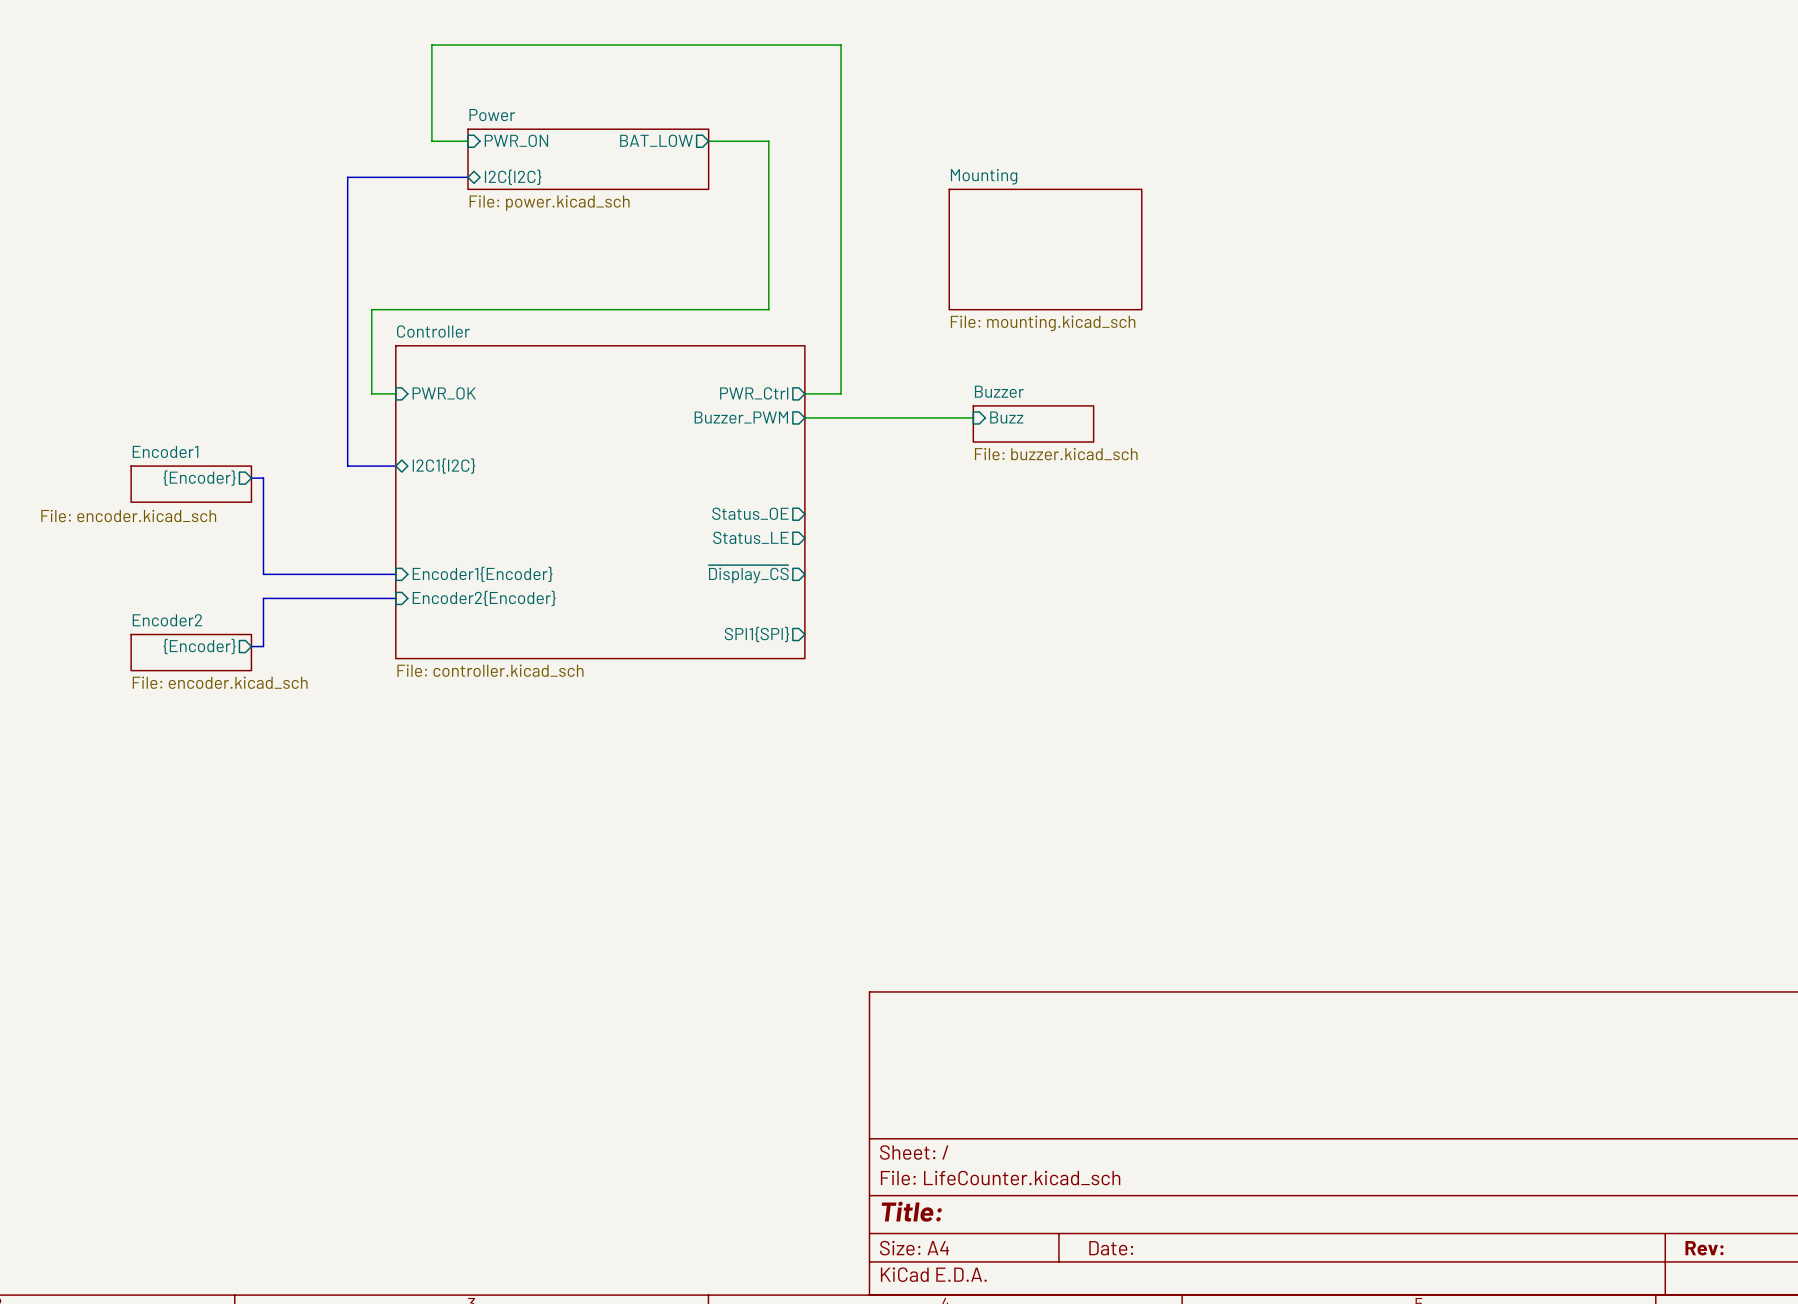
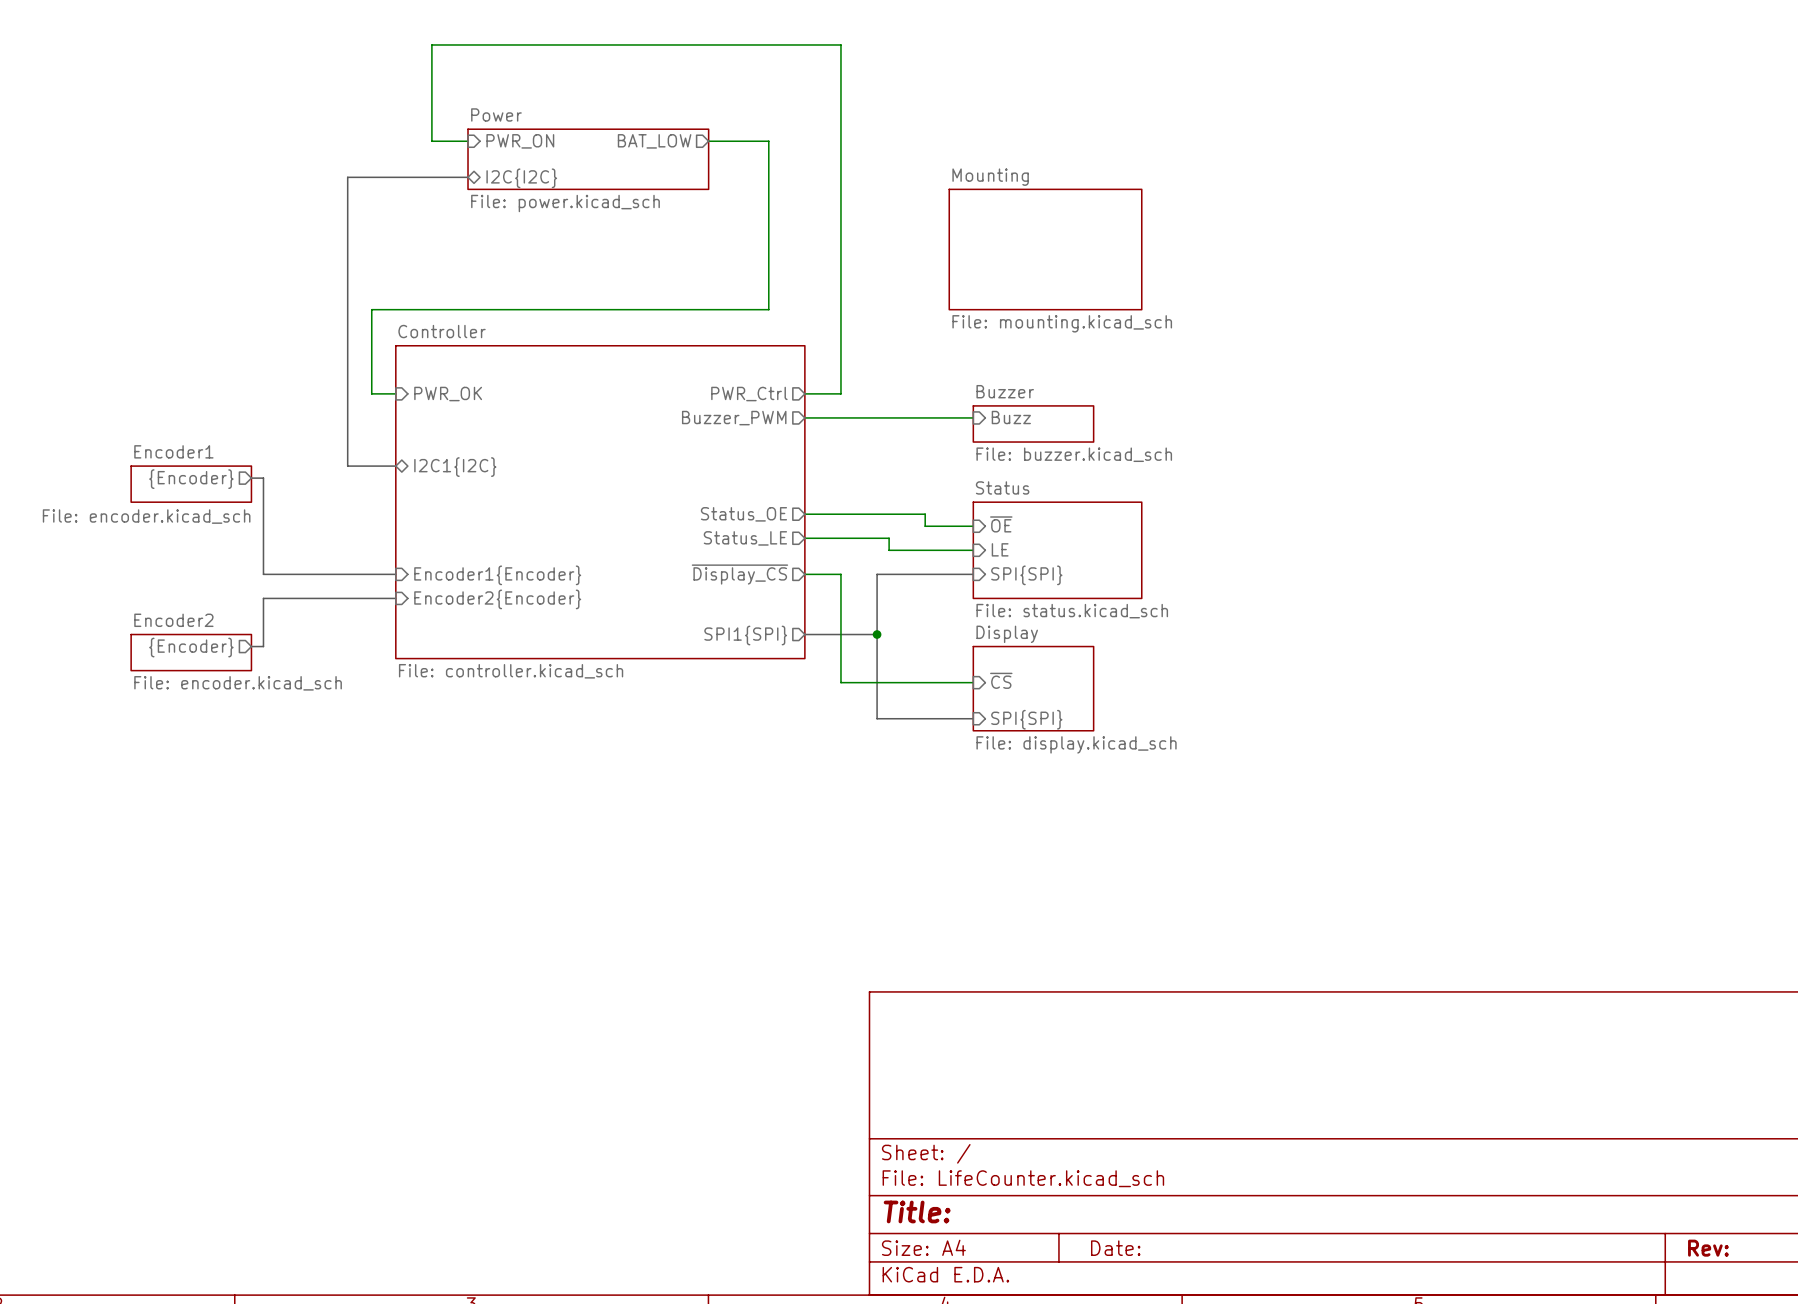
wire: none -> (804, 514) (925, 514) (925, 526) (973, 526)
sheet pin: none -> ~{OE} (1001, 524)
wire: none -> (804, 538) (889, 538) (889, 550) (973, 550)
sheet pin: none -> LE (1000, 549)
sheet Status: none -> File: status.kicad_sch (1057, 550)
wire: none -> (804, 574) (840, 574) (840, 682) (973, 682)
bus: none -> (973, 574) (877, 574) (877, 718) (973, 718)
sheet pin: none -> SPI{SPI} (1026, 575)
bus: none -> (804, 634) (877, 634)
junction: none -> (877, 634)
sheet pin: none -> ~{CS} (1001, 680)
sheet Display: none -> File: display.kicad_sch (1033, 688)
sheet pin: none -> SPI{SPI} (1026, 719)

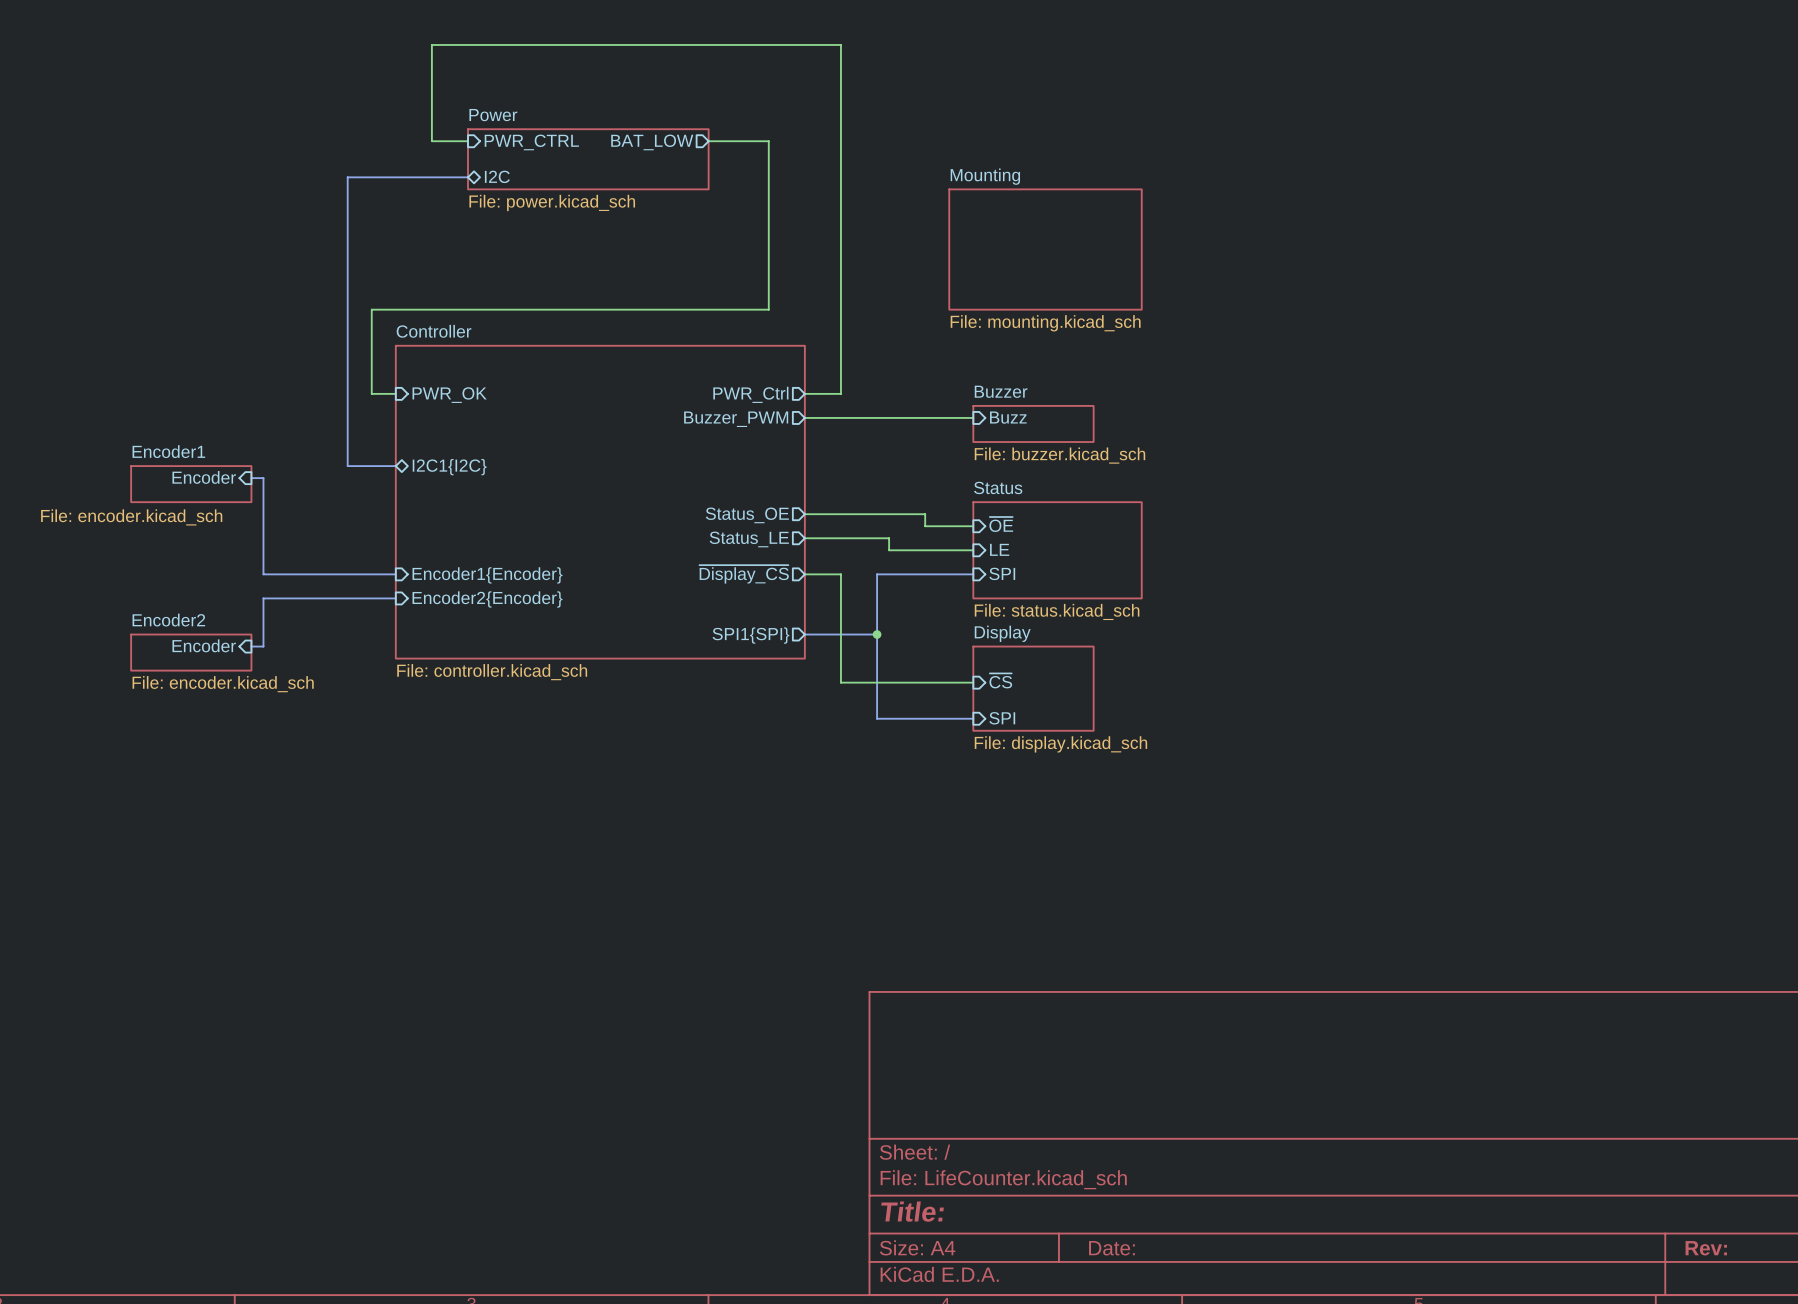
sheet pin: PWR_ON (520, 141) -> PWR_CTRL (531, 142)
sheet pin: I2C{I2C} (521, 178) -> I2C (497, 176)
sheet pin shape: output (191, 479) -> input (204, 477)
sheet pin: {Encoder} (191, 479) -> Encoder (204, 477)
sheet pin: SPI{SPI} (1026, 575) -> SPI (1002, 573)
sheet pin shape: output (191, 647) -> input (204, 645)
sheet pin: {Encoder} (191, 647) -> Encoder (204, 645)
sheet pin: SPI{SPI} (1026, 719) -> SPI (1002, 718)

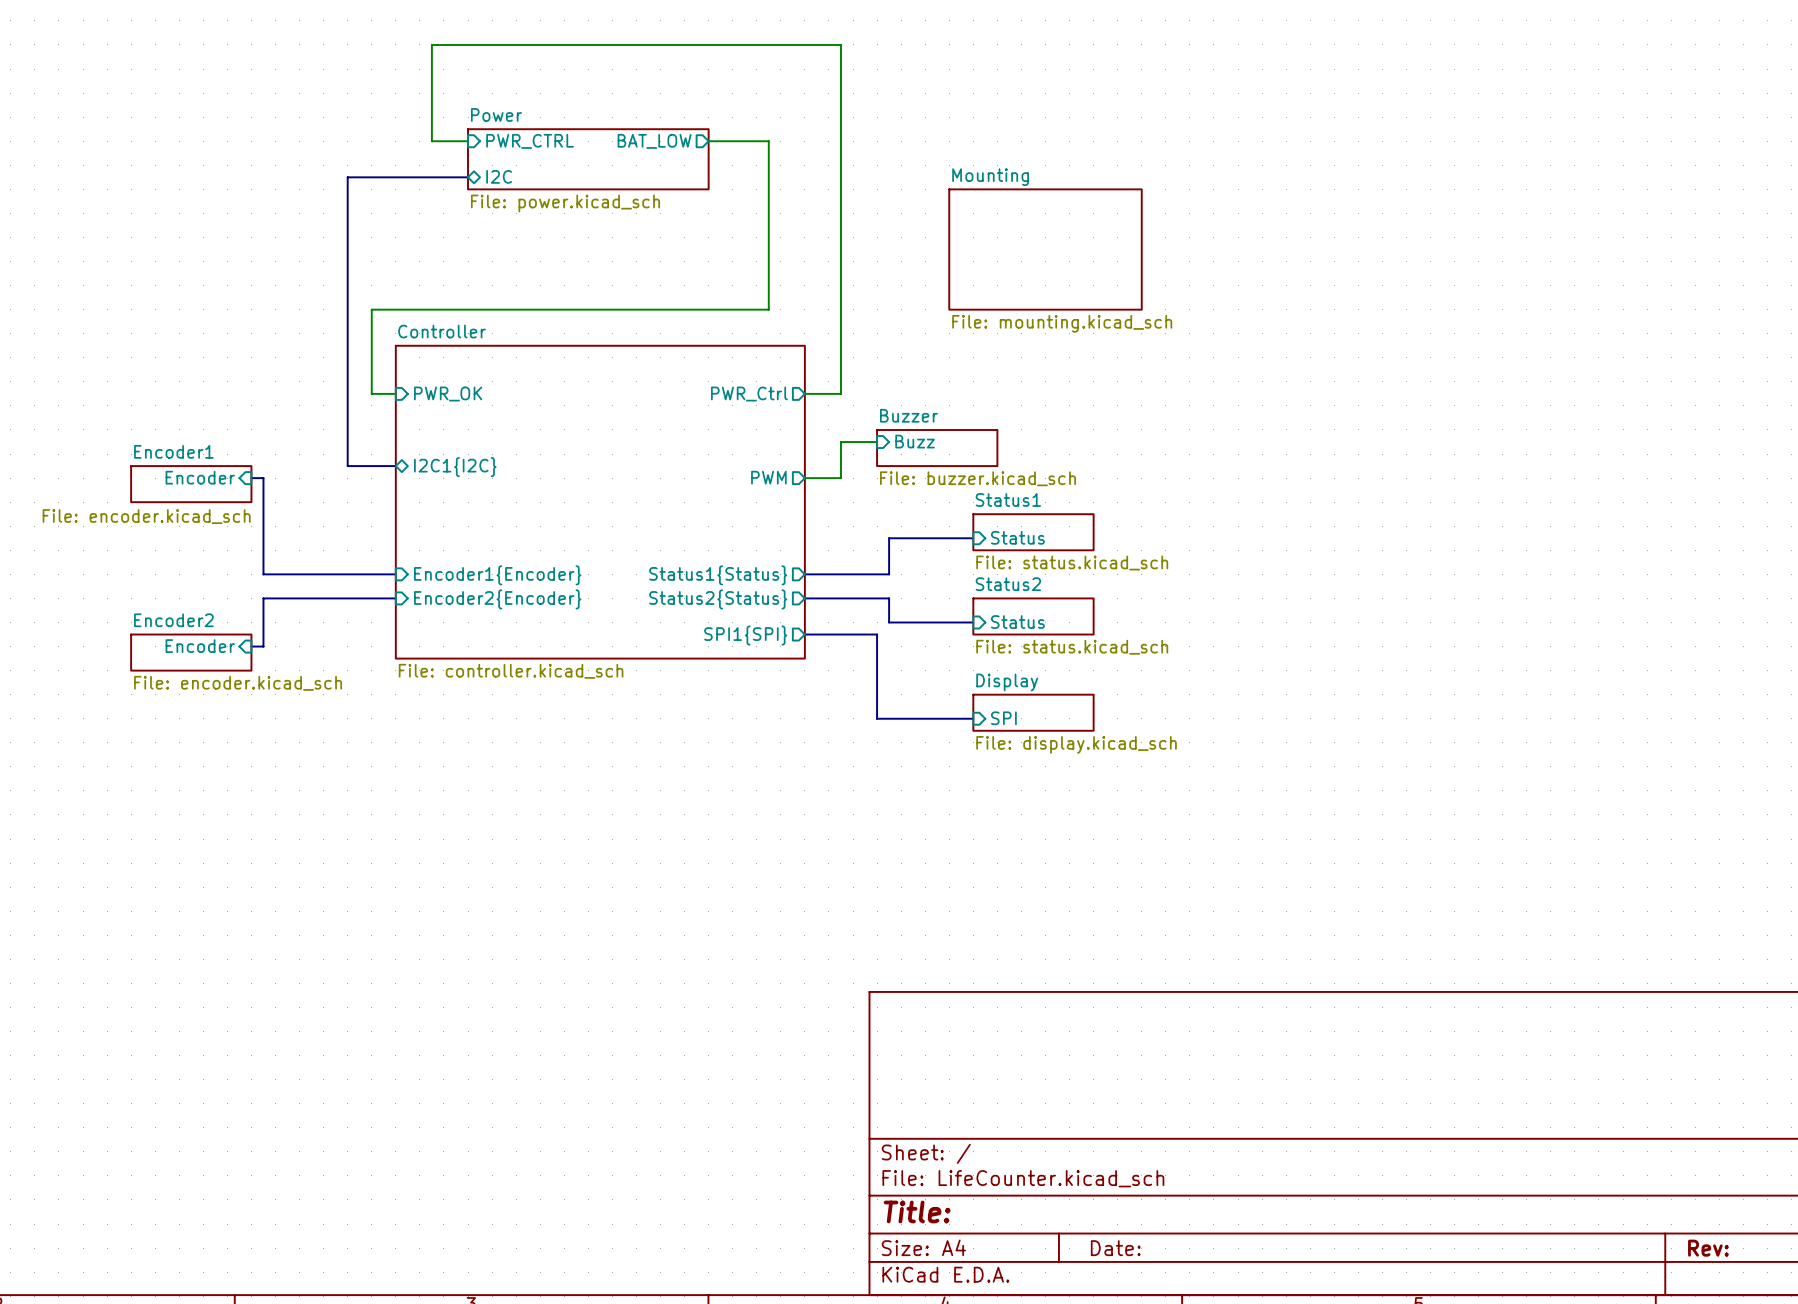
wire: (804, 417) (973, 417) -> none
sheet pin position: Buzz (1008, 417) -> Buzz (915, 441)
sheet pin: Buzzer_PWM (736, 419) -> none
sheet Buzzer position: (1033, 423) -> (937, 448)
wire: none -> (877, 442) (840, 442) (840, 478) (804, 478)
sheet pin: none -> PWM (768, 477)
wire: (804, 514) (925, 514) (925, 526) (973, 526) -> none
sheet pin: Status_OE (747, 515) -> none
sheet pin: ~{OE} (1001, 524) -> none
sheet Status1: none -> File: status.kicad_sch (1033, 532)
sheet pin: none -> Status (1017, 537)
wire: (804, 538) (889, 538) (889, 550) (973, 550) -> none
sheet pin: Status_LE (749, 539) -> none
sheet pin: LE (999, 549) -> none
sheet Status: File: status.kicad_sch (1057, 550) -> none
sheet pin: SPI (1002, 573) -> none
sheet pin: ~{Display_CS} (744, 574) -> Status1{Status} (718, 575)
wire: (804, 574) (840, 574) (840, 682) (973, 682) -> none
bus: (877, 574) (877, 634) -> (877, 574) (804, 574)
bus: (889, 574) (973, 574) -> (889, 574) (889, 538) (973, 538)
bus: none -> (804, 598) (889, 598) (889, 622) (973, 622)
sheet pin: none -> Status2{Status} (718, 599)
sheet Status2: none -> File: status.kicad_sch (1033, 616)
sheet pin: none -> Status (1017, 622)
junction: (877, 634) -> none
sheet pin: ~{CS} (1000, 680) -> none
sheet Display: File: display.kicad_sch (1033, 688) -> none
sheet Display: none -> File: display.kicad_sch (1033, 712)

